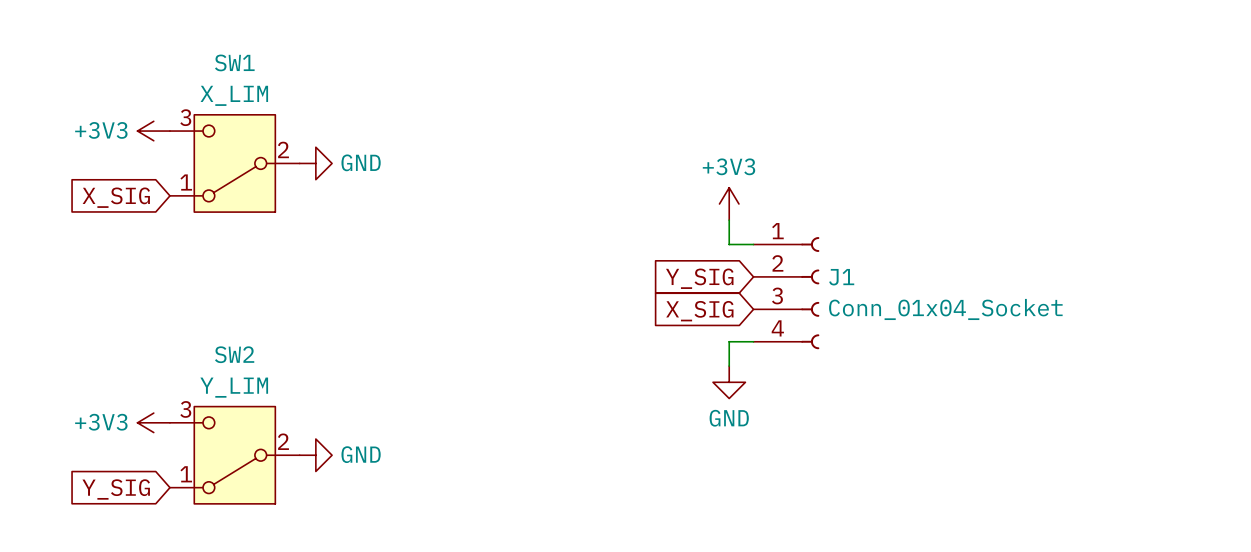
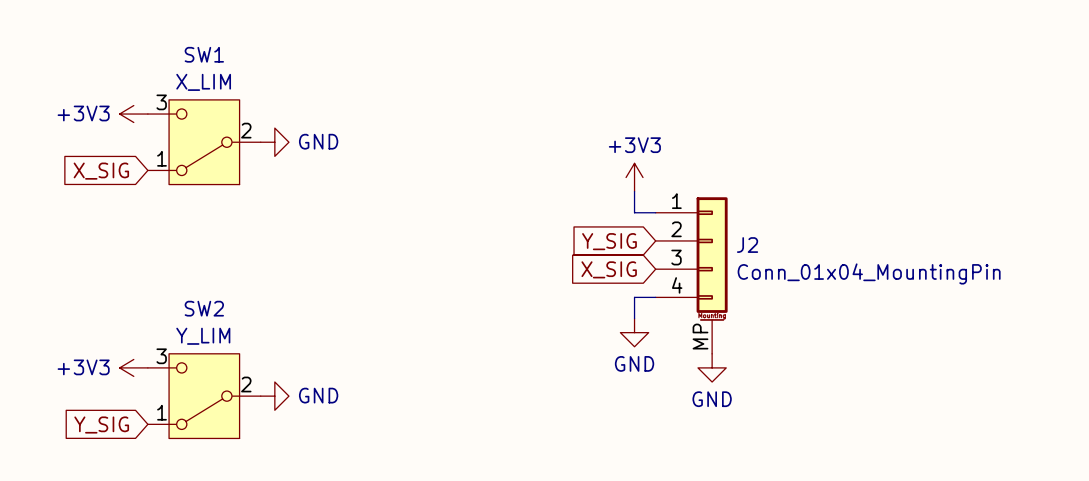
J1: Conn_01x04_Socket (786, 293) -> none
J2: none -> Conn_01x04_MountingPin (691, 275)
power symbol: none -> GND (712, 367)

